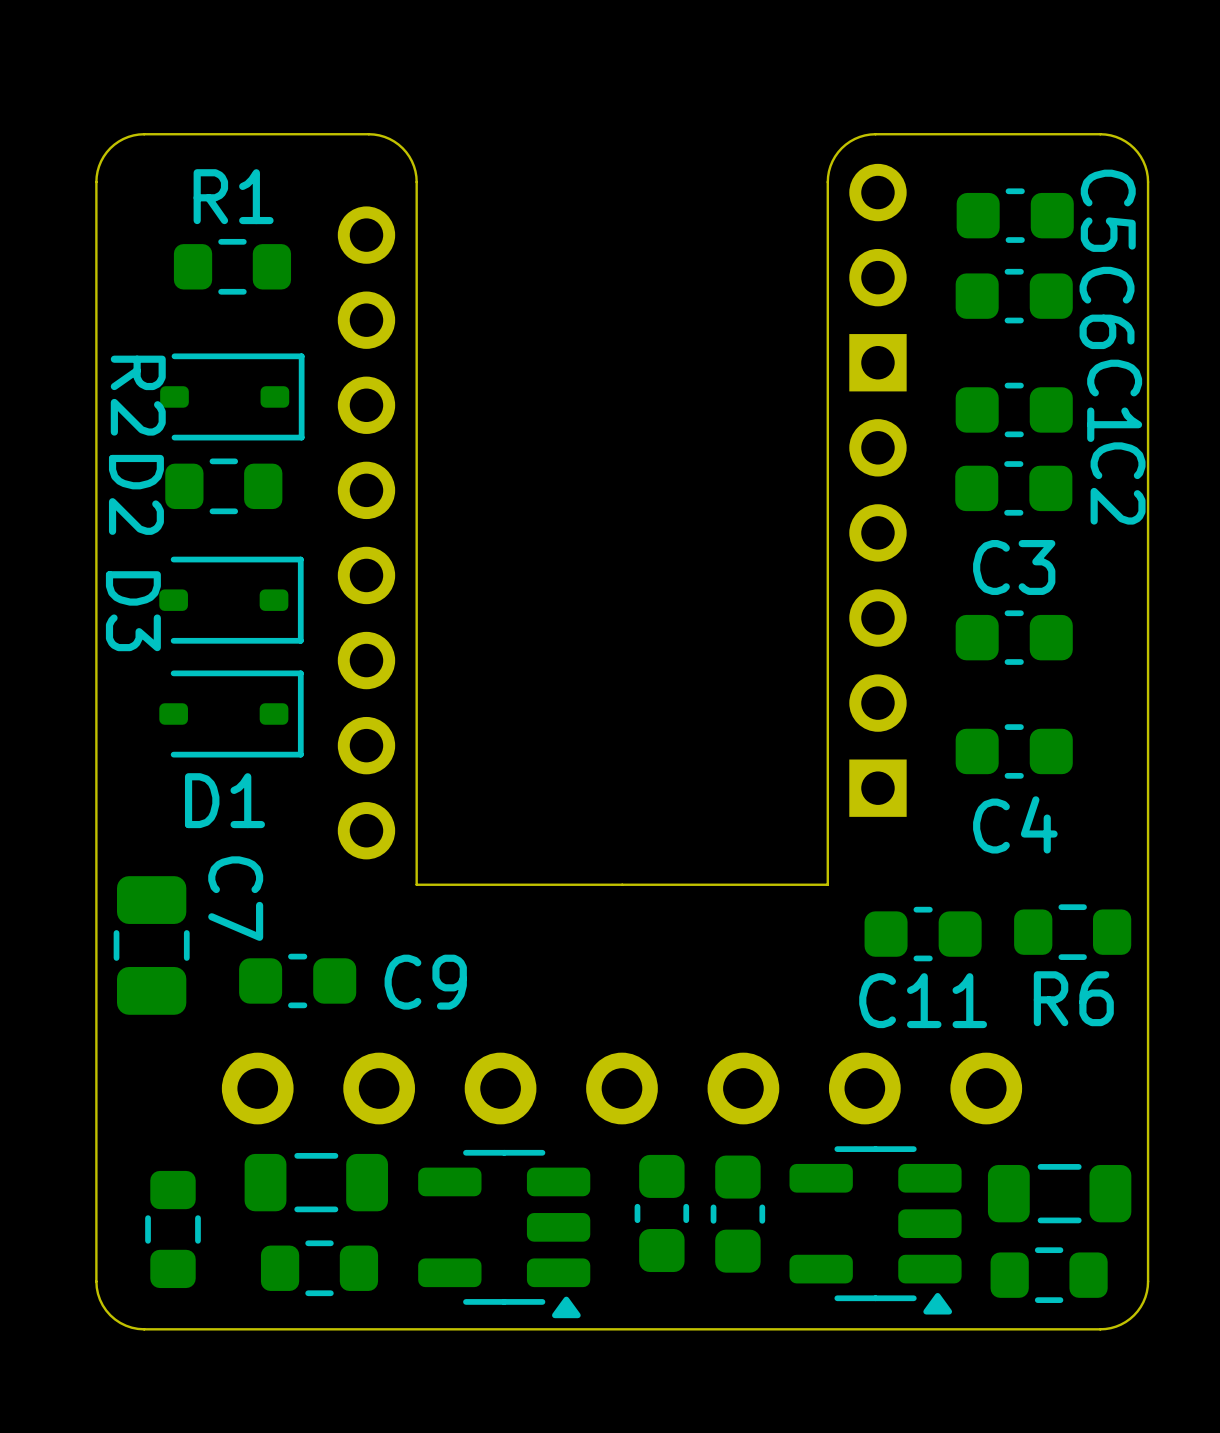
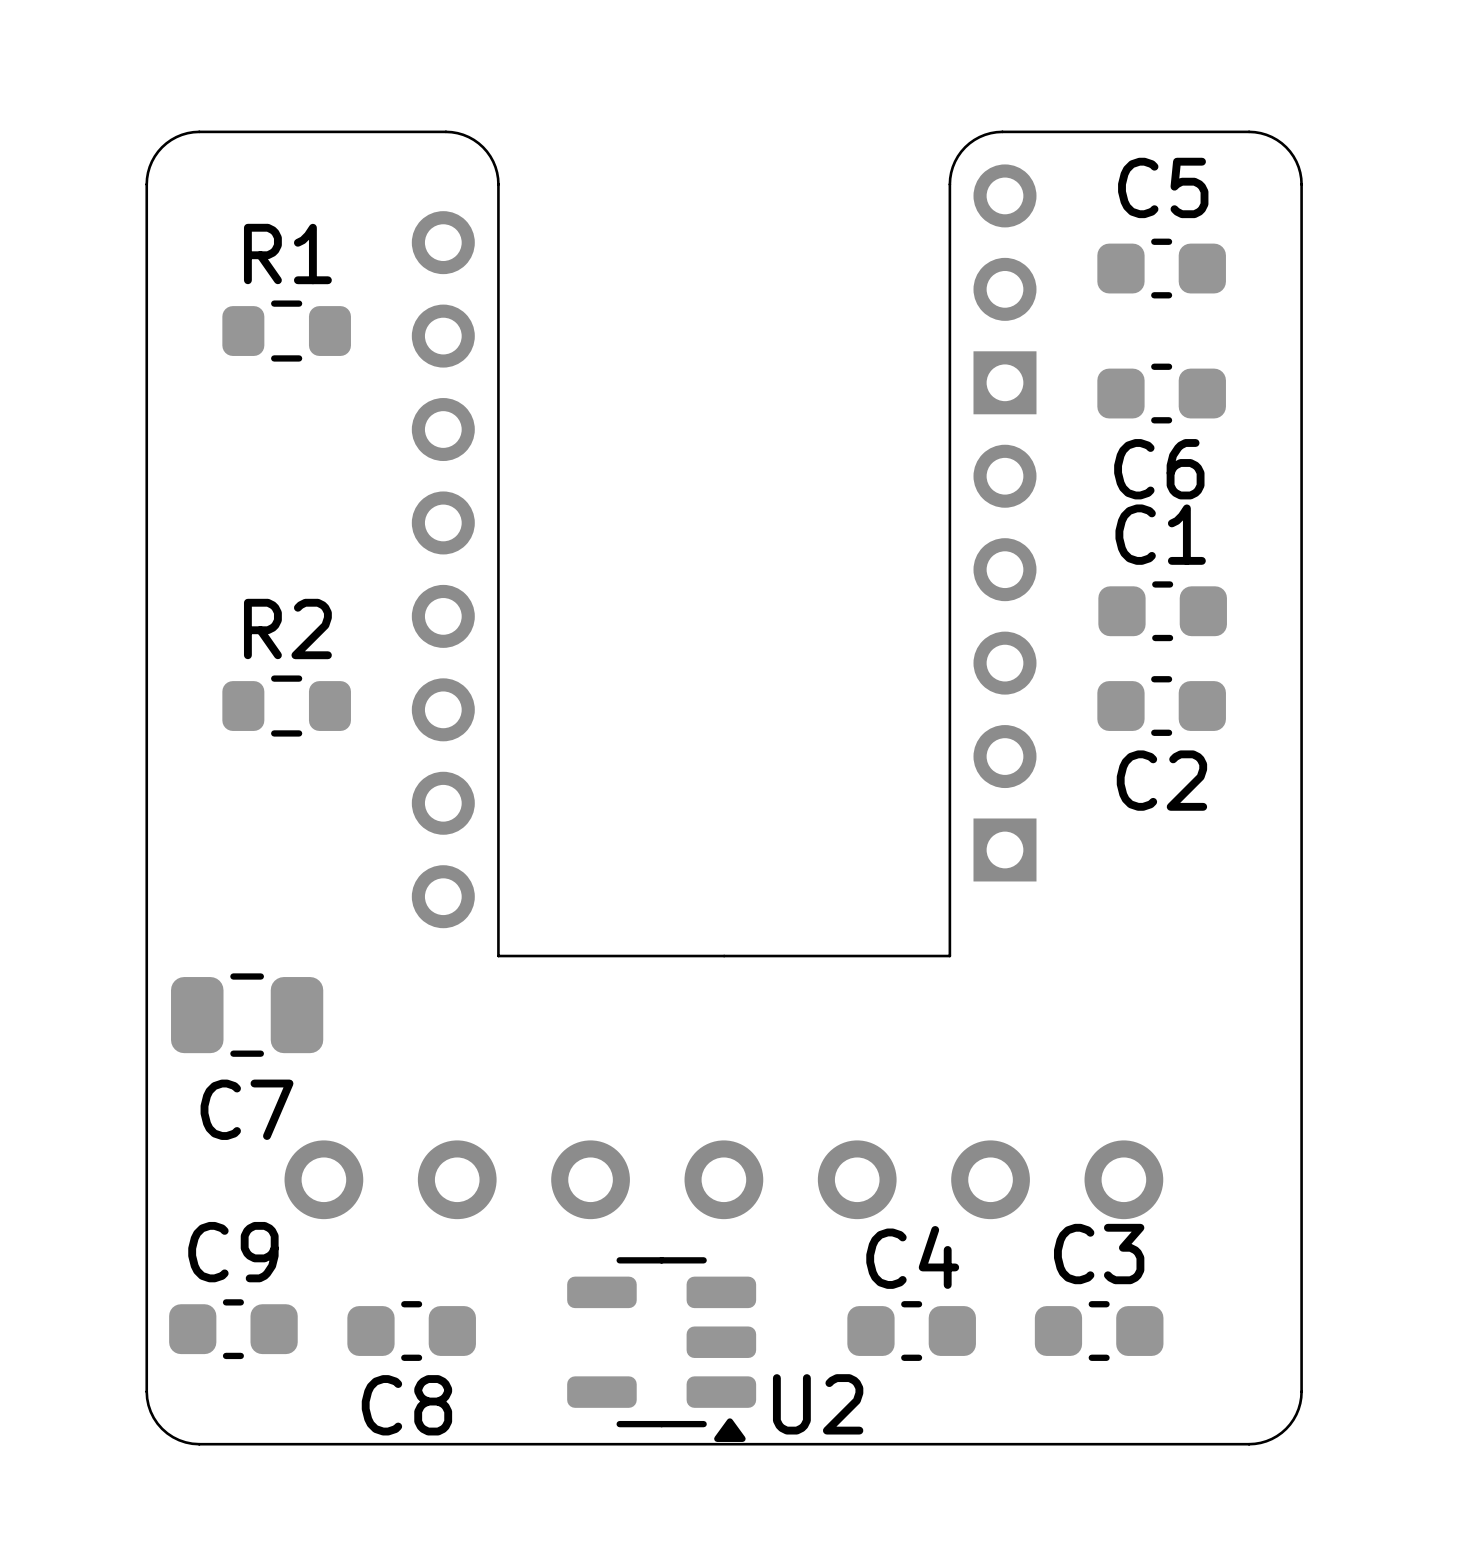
C5 name rotation: 0° (1108, 210) -> 90° counterclockwise (1163, 187)
C5 position: (1015, 215) -> (1161, 268)
R1 position: (232, 266) -> (286, 331)
C6 position: (1014, 296) -> (1161, 393)
C6 name rotation: 0° (1107, 307) -> 90° counterclockwise (1159, 469)
R2 name rotation: 0° (138, 395) -> 90° counterclockwise (287, 628)
D2: (232, 396) -> none
C1 name rotation: 0° (1114, 400) -> 90° counterclockwise (1160, 534)
C1 position: (1014, 409) -> (1162, 611)
C2 name rotation: 0° (1118, 483) -> 90° counterclockwise (1161, 780)
C2 name position: C2 (1118, 483) -> C2 (1161, 780)
R2 position: (223, 486) -> (286, 706)
C2 position: (1013, 488) -> (1161, 706)
D3: (231, 600) -> none
C3 position: (1014, 637) -> (1099, 1331)
D1: (231, 714) -> none
C4 position: (1014, 751) -> (911, 1331)
C4 name position: C4 (1015, 824) -> C4 (912, 1257)
R6: (1072, 932) -> none
C11: (923, 934) -> none
C7 rotation: 0° (151, 945) -> 90° clockwise (247, 1015)
C9 position: (297, 980) -> (233, 1329)
C9 name position: C9 (425, 982) -> C9 (233, 1252)
part: (316, 1182) -> none
part: (1059, 1193) -> none
part: (661, 1213) -> none
part: (737, 1214) -> none
C8: none -> (411, 1331)
part: (173, 1229) -> none
part: (875, 1230) -> none
part: (504, 1234) -> none
U2: none -> (661, 1349)
part: (319, 1268) -> none
part: (1049, 1275) -> none

